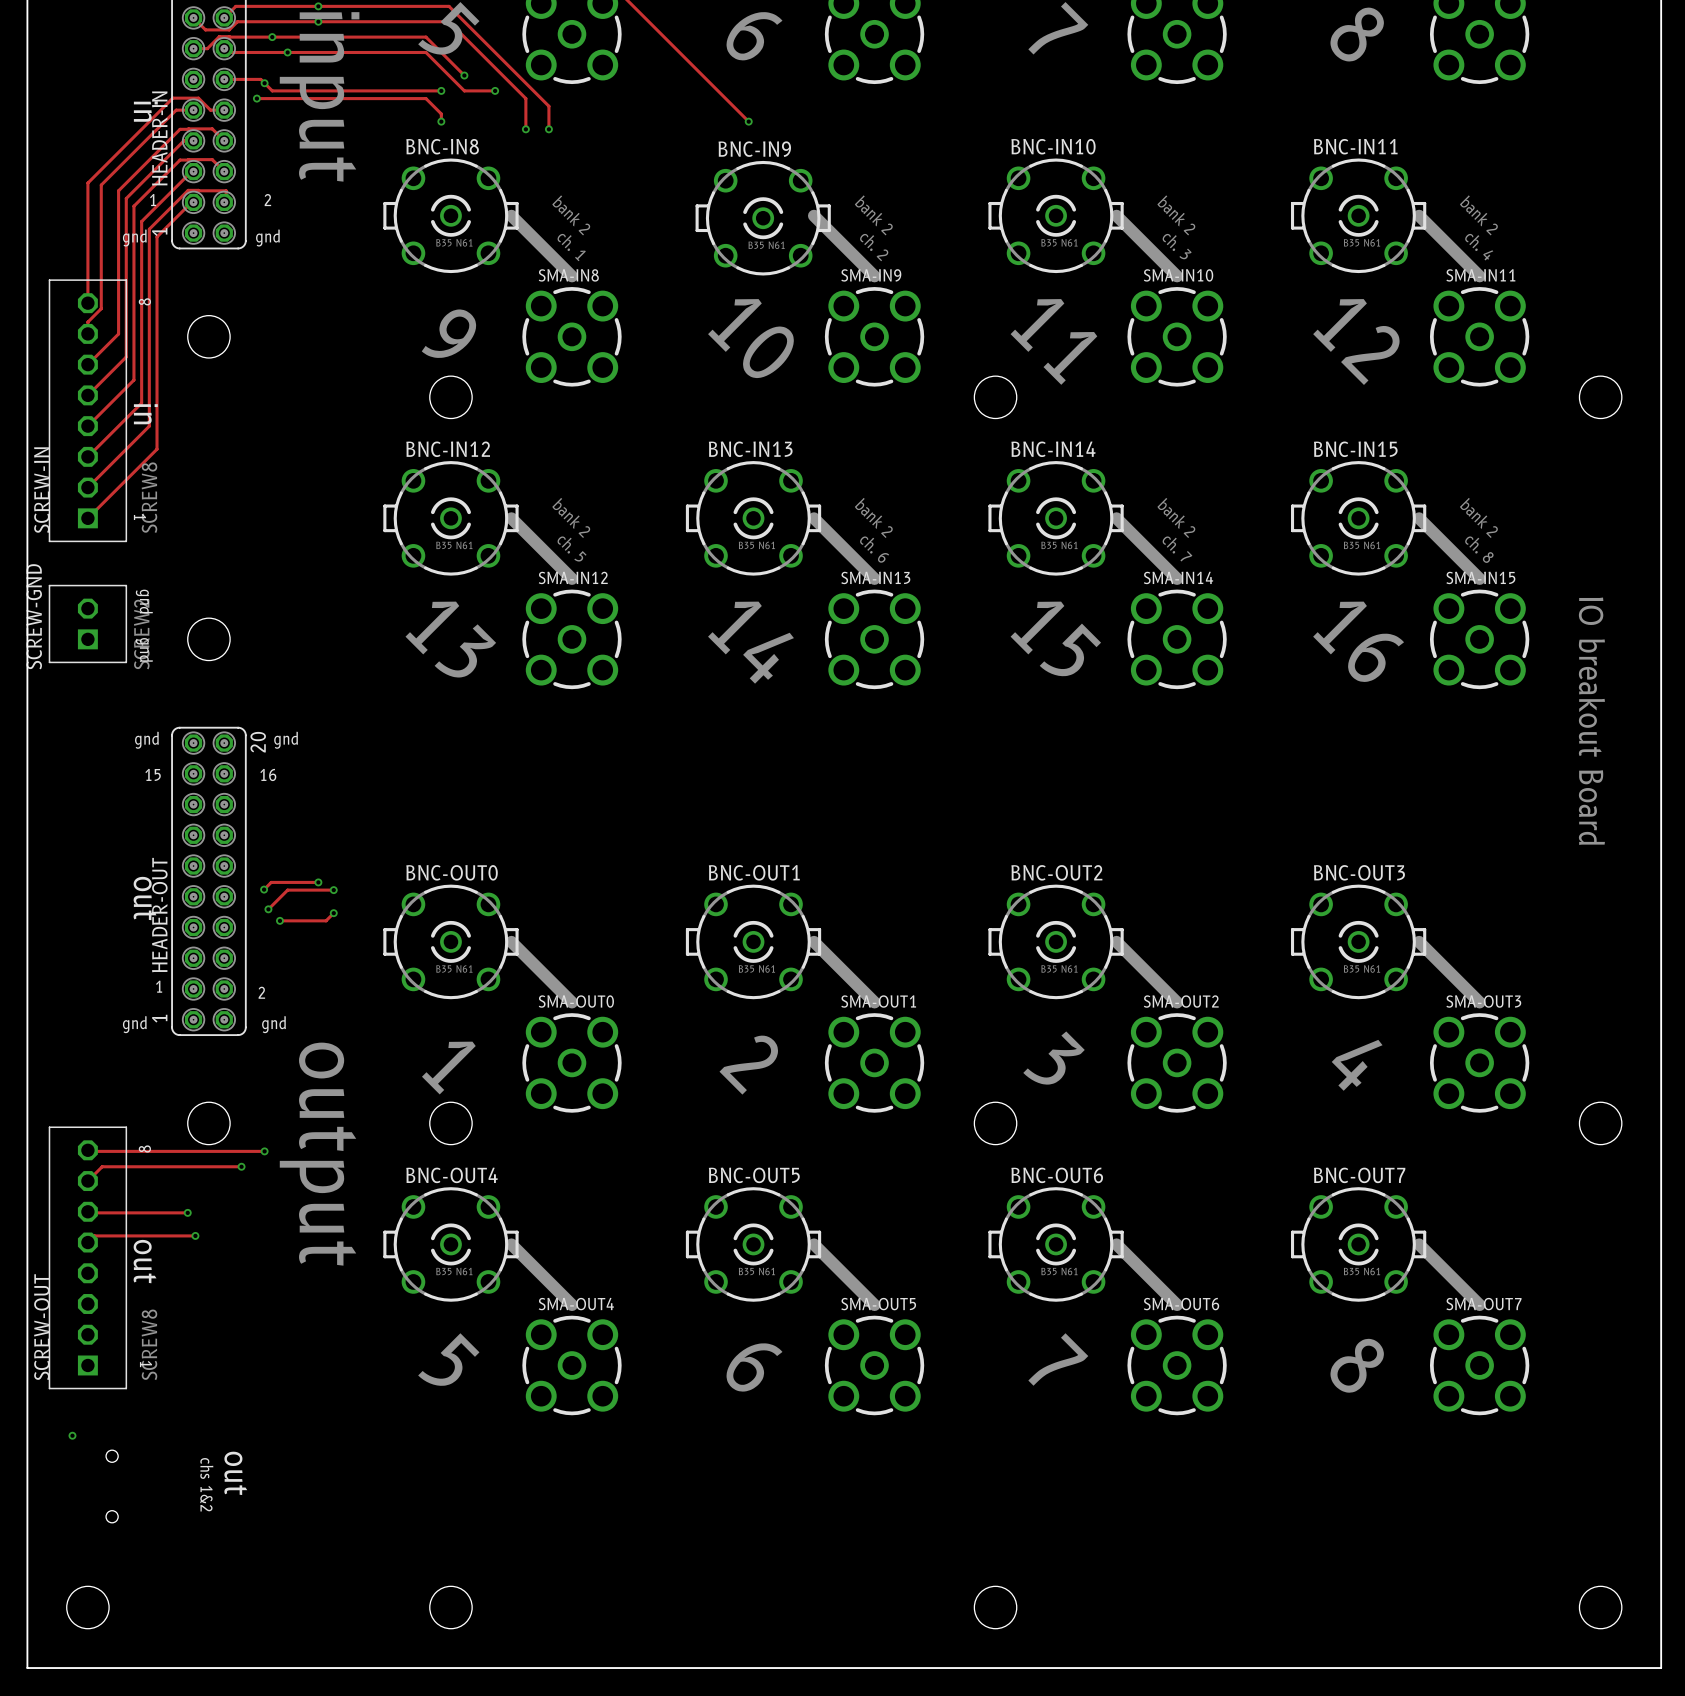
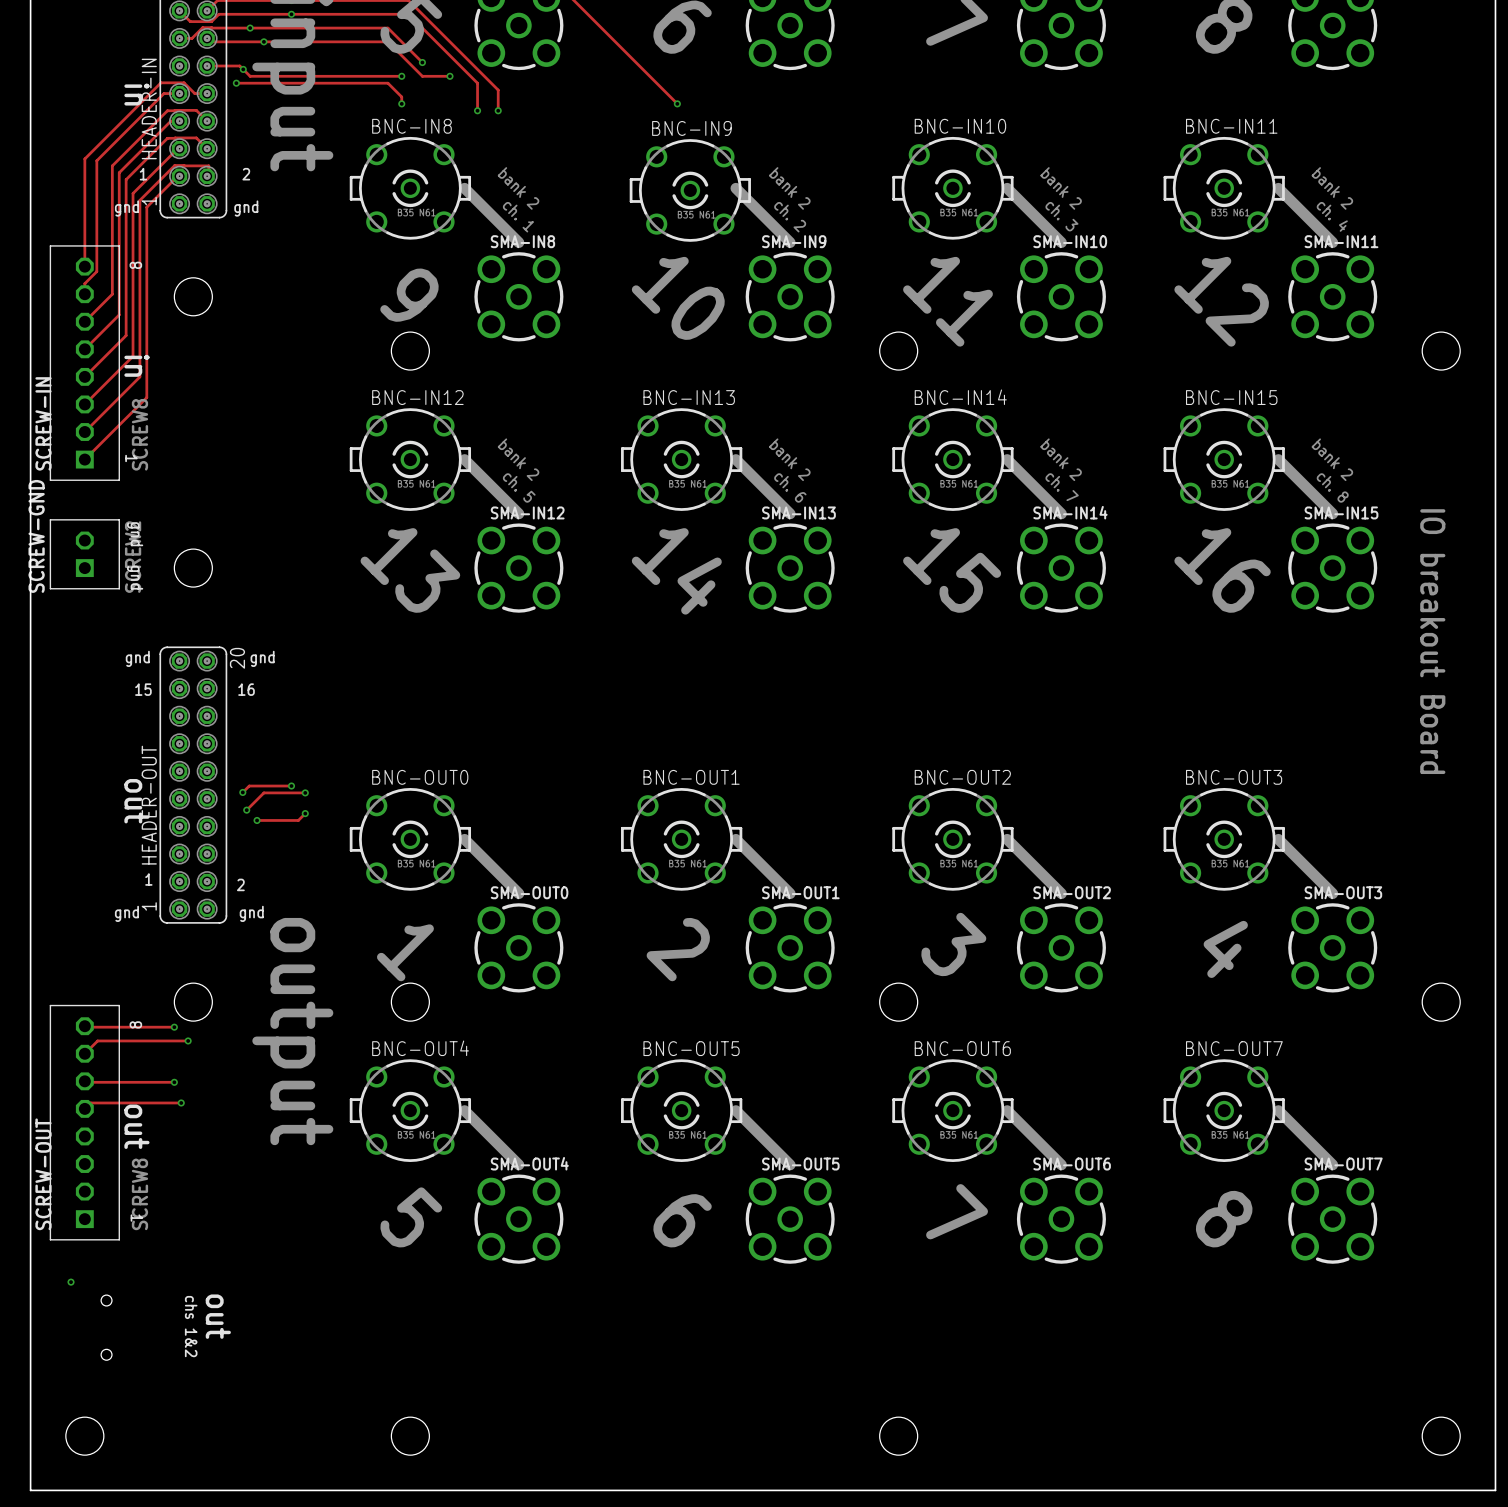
track: (187, 1151) (264, 1151) -> none
via: none -> (174, 1027)
via: (264, 1151) -> none
track: (203, 1166) (241, 1166) -> none
via: none -> (188, 1040)
via: (241, 1166) -> none

